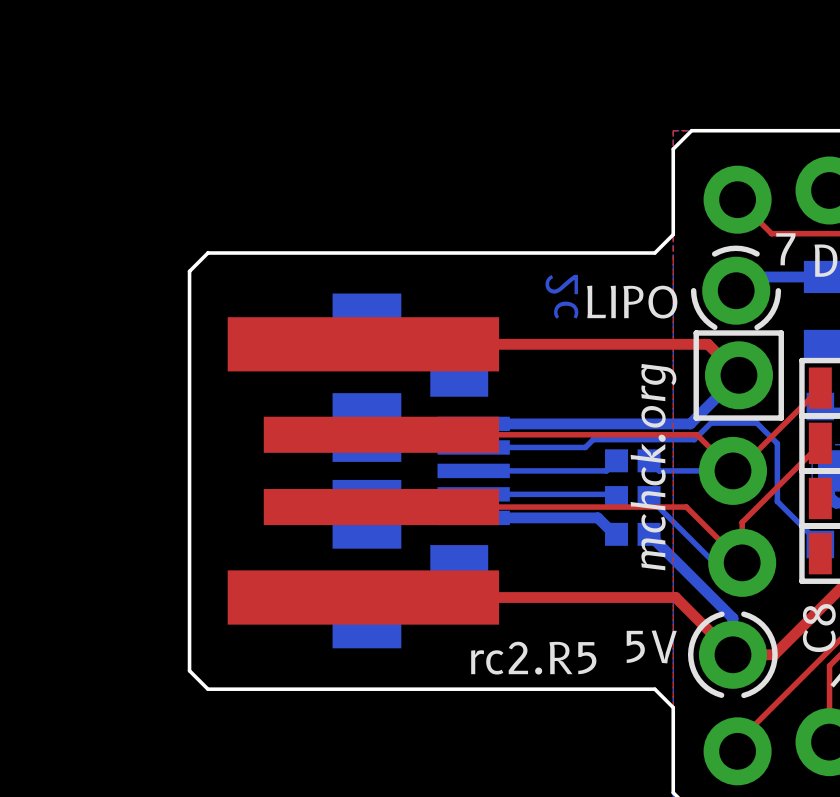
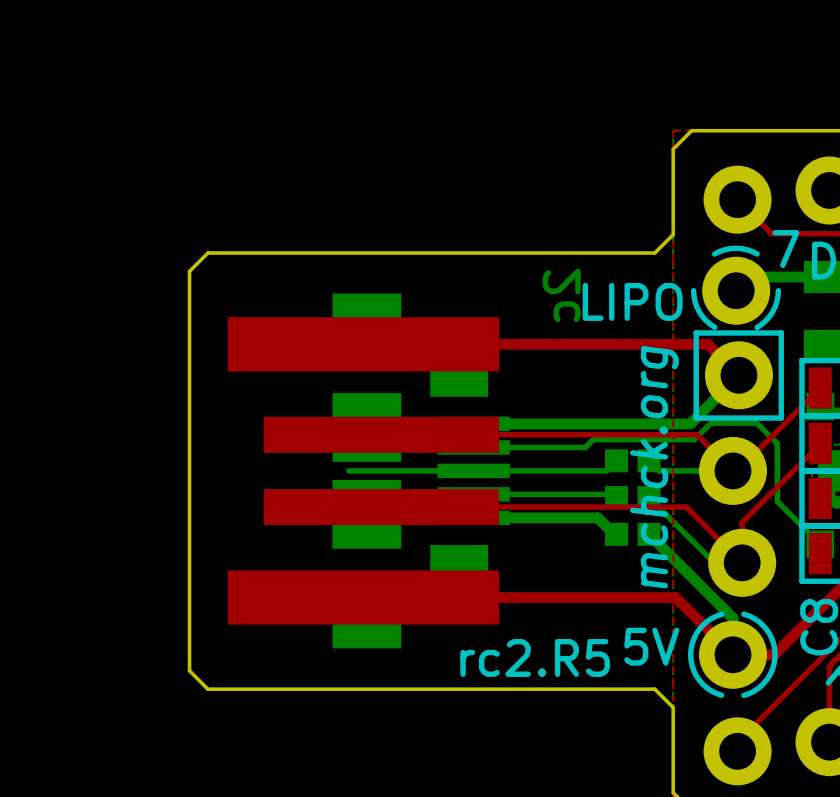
bottom track: none -> (348, 470) (473, 470)

